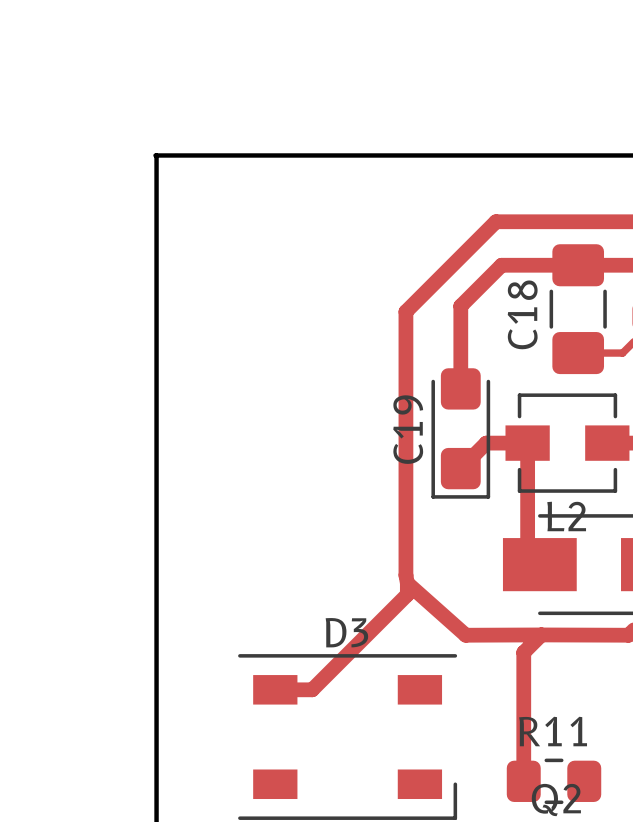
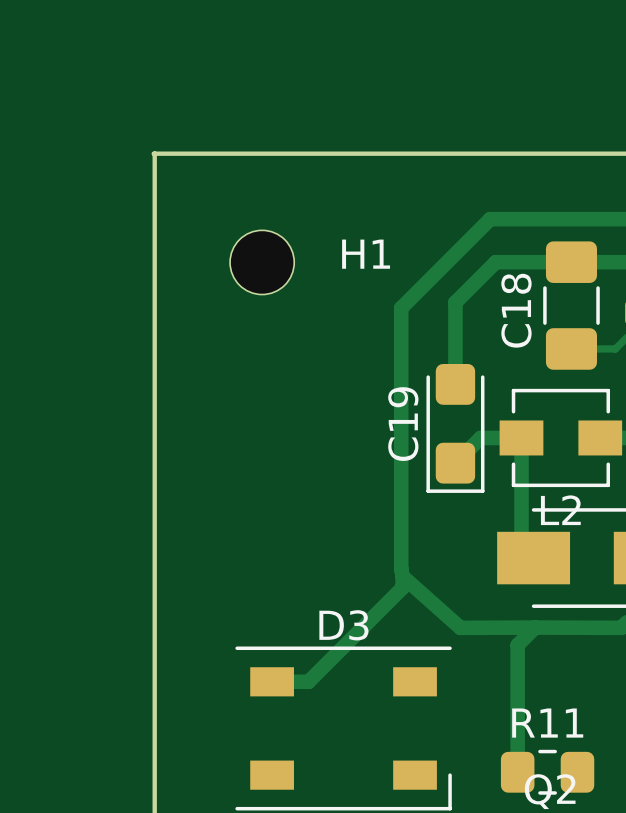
H1: none -> (262, 262)

